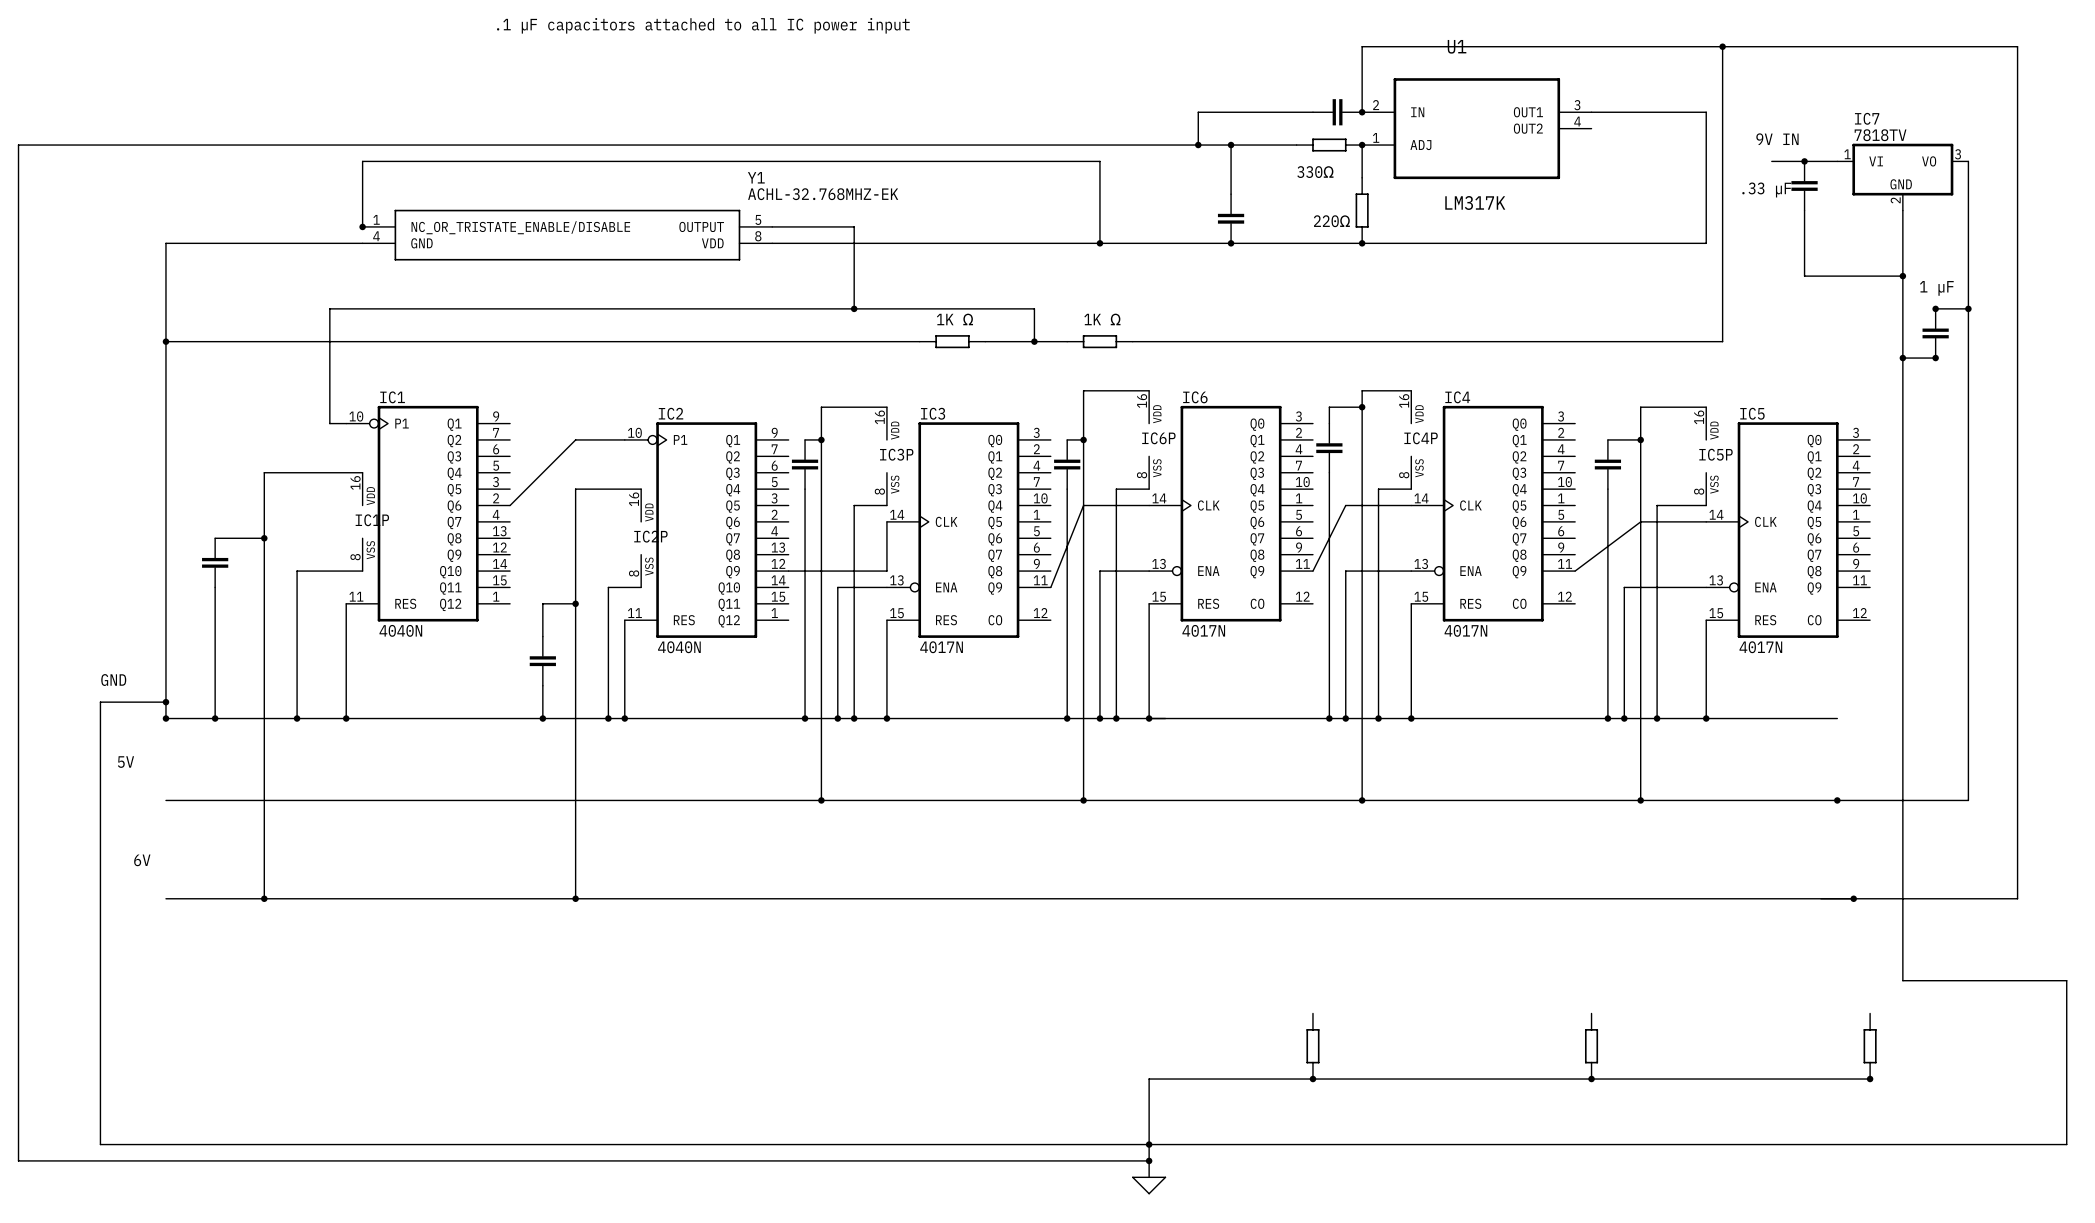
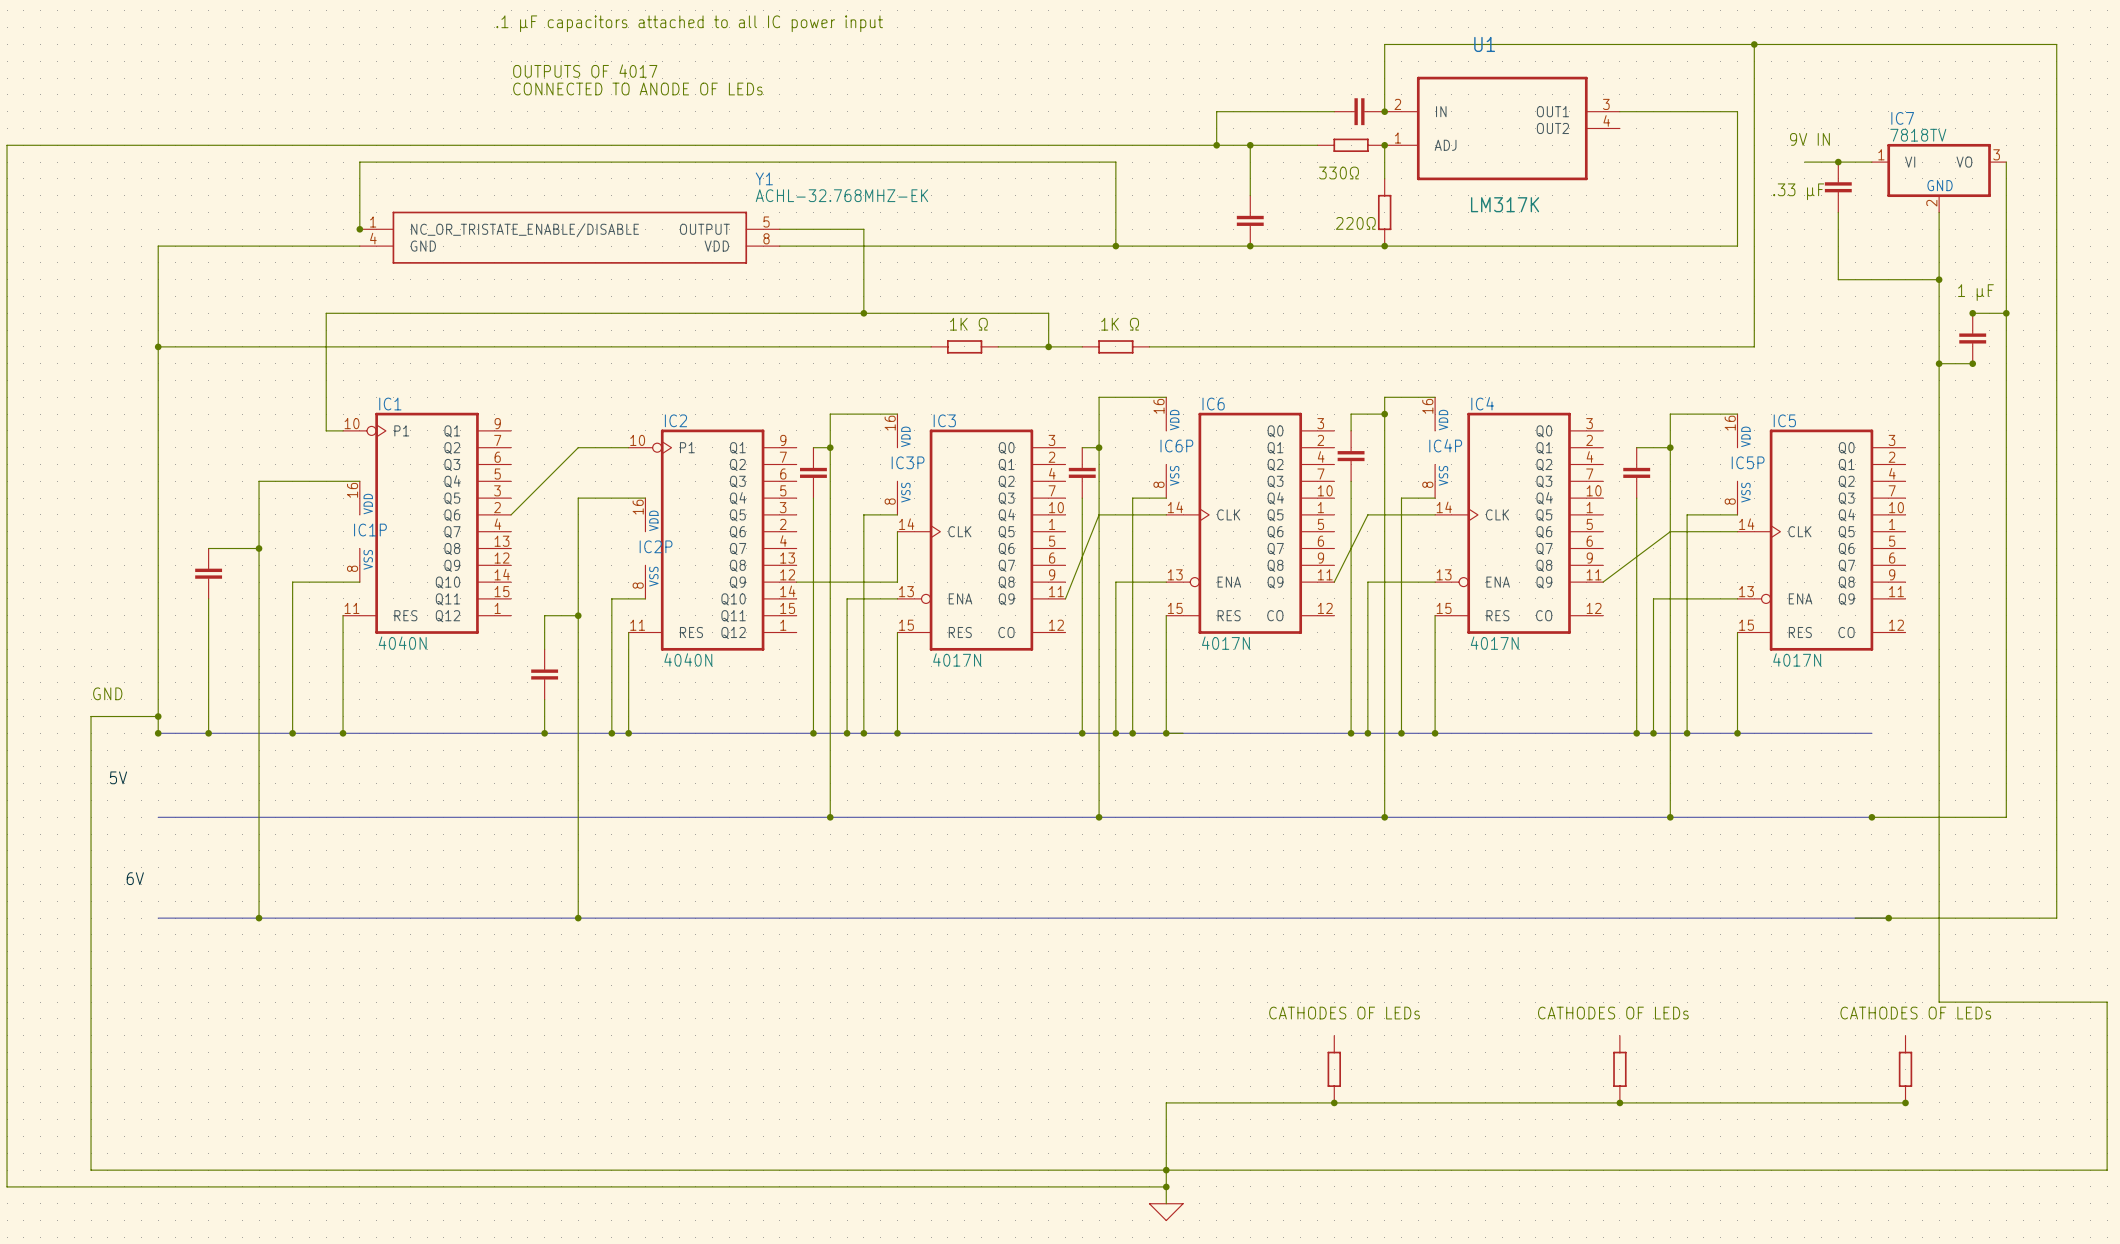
text: none -> OUTPUTS OF 4017 (585, 71)
text: none -> CONNECTED TO ANODE OF LEDs (637, 89)
text: none -> CATHODES OF LEDs (1344, 1013)
text: none -> CATHODES OF LEDs (1613, 1013)
text: none -> CATHODES OF LEDs (1915, 1013)

